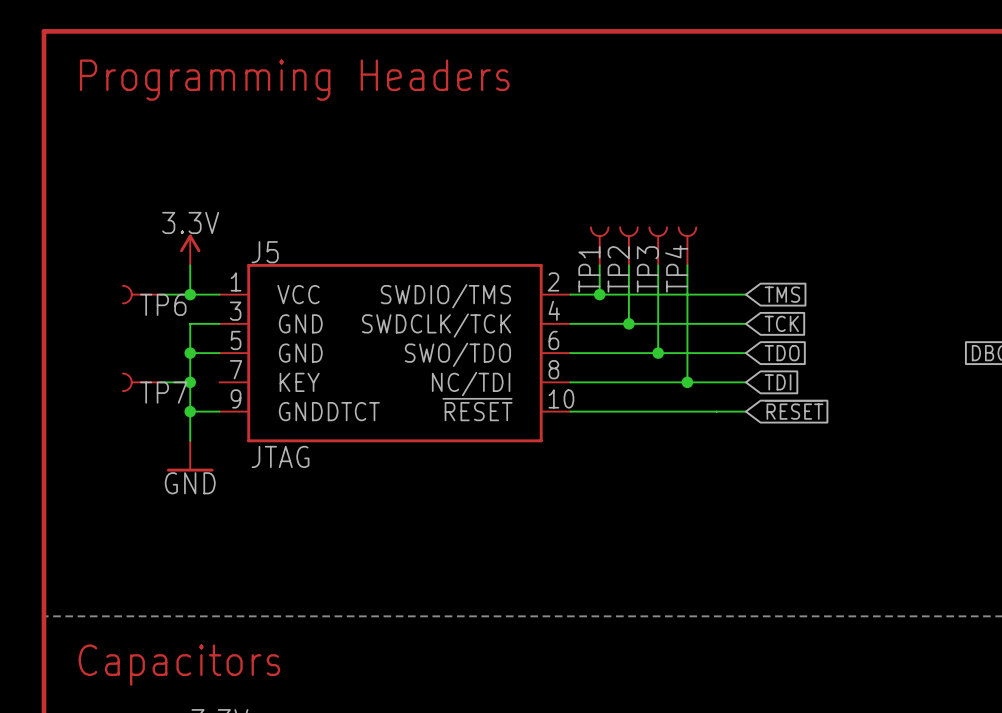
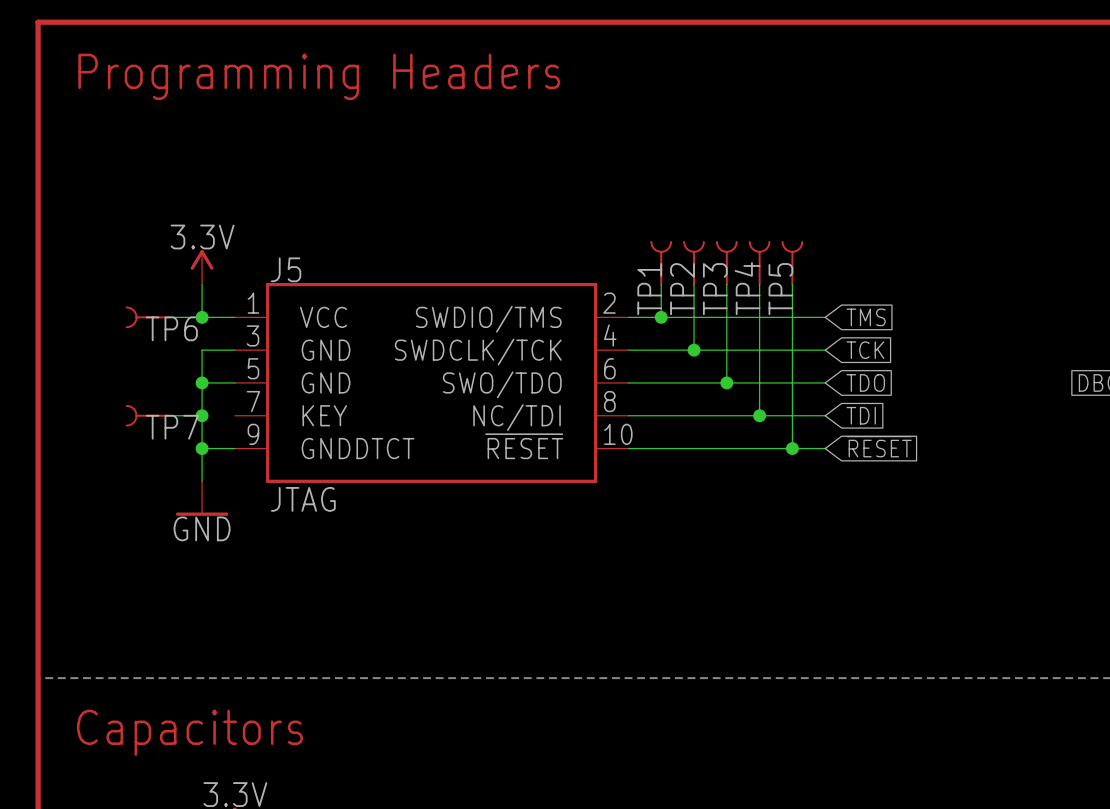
TP5: none -> (792, 263)
wire: none -> (792, 284) (792, 448)
junction: none -> (792, 448)

